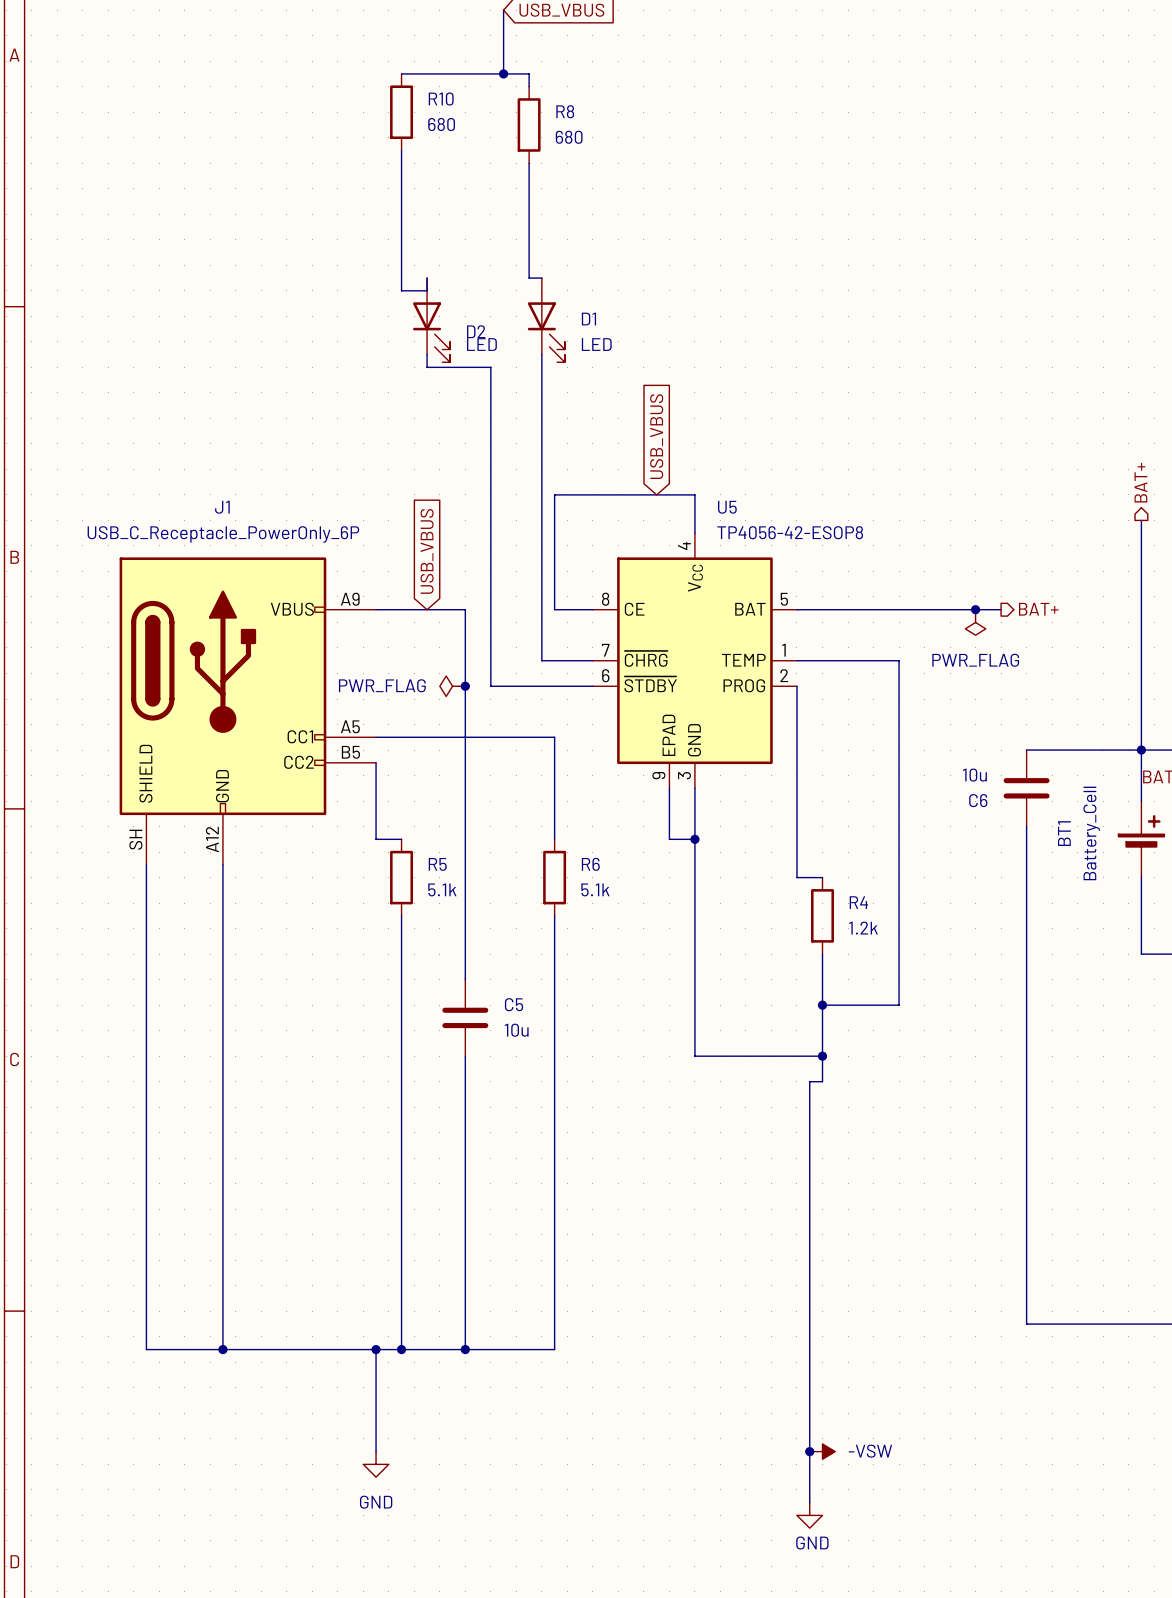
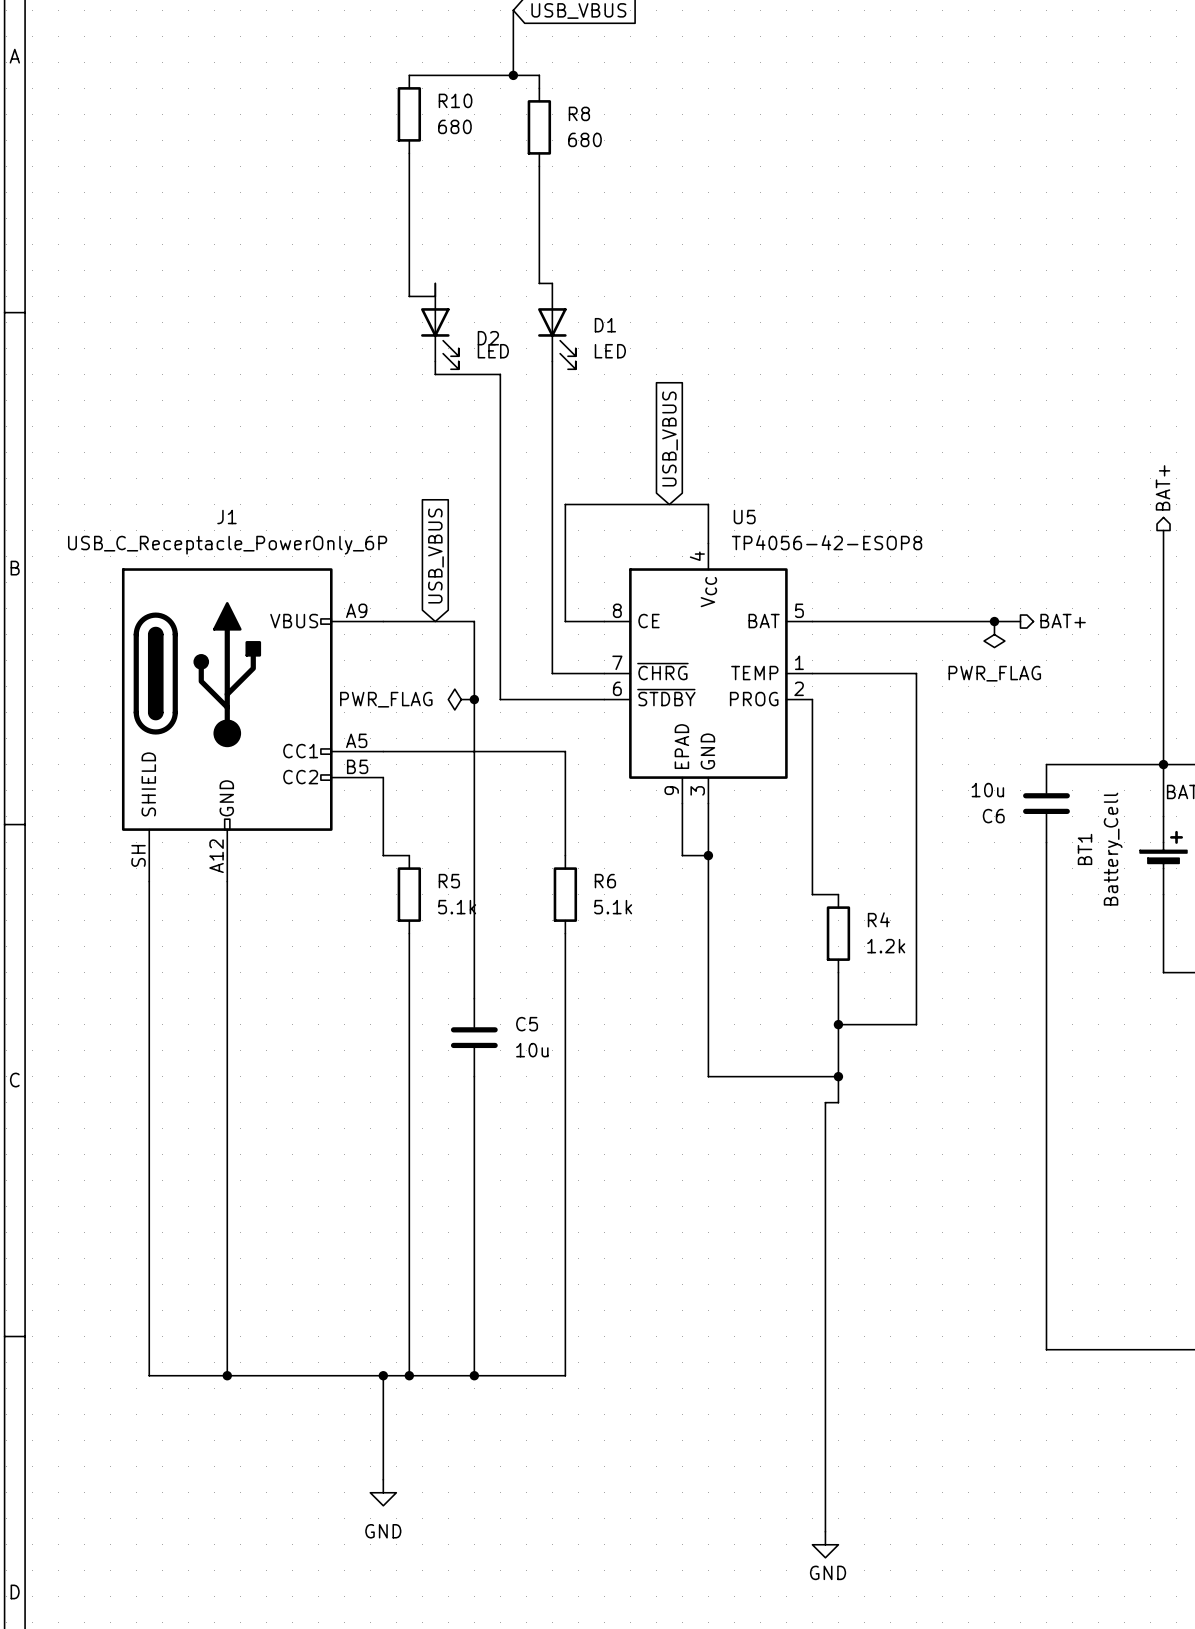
junction: (809, 1451) -> none
power symbol: -VSW (822, 1451) -> none

